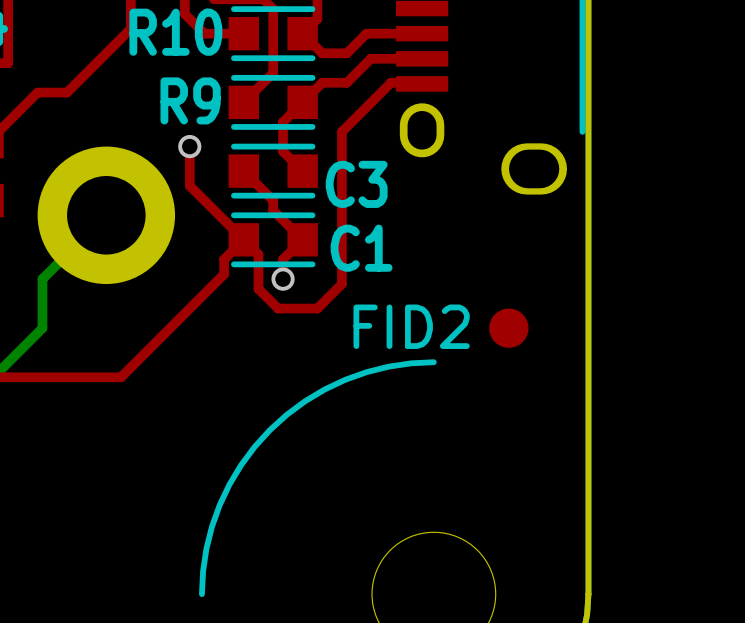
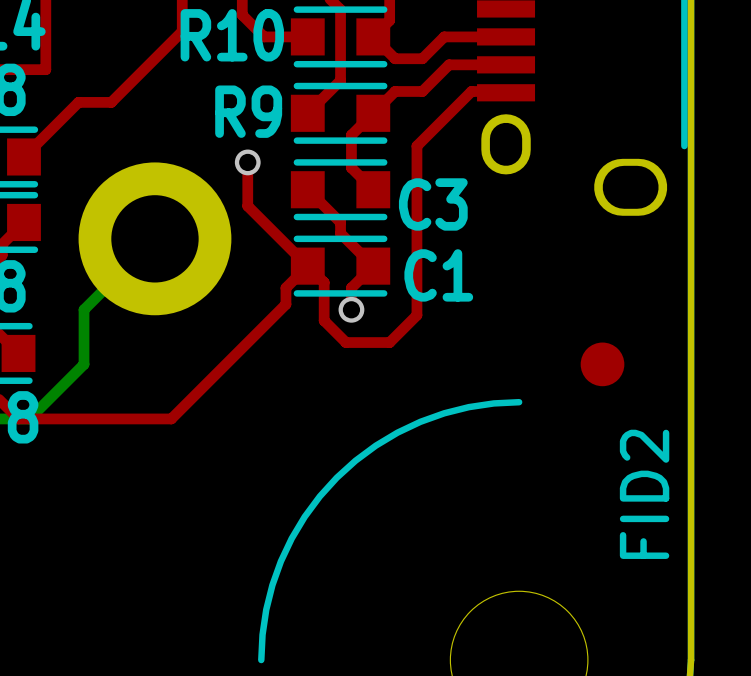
FID2 name rotation: 0° (411, 326) -> 90° counterclockwise (644, 494)
FID2 name position: FID2 (411, 326) -> FID2 (644, 494)

